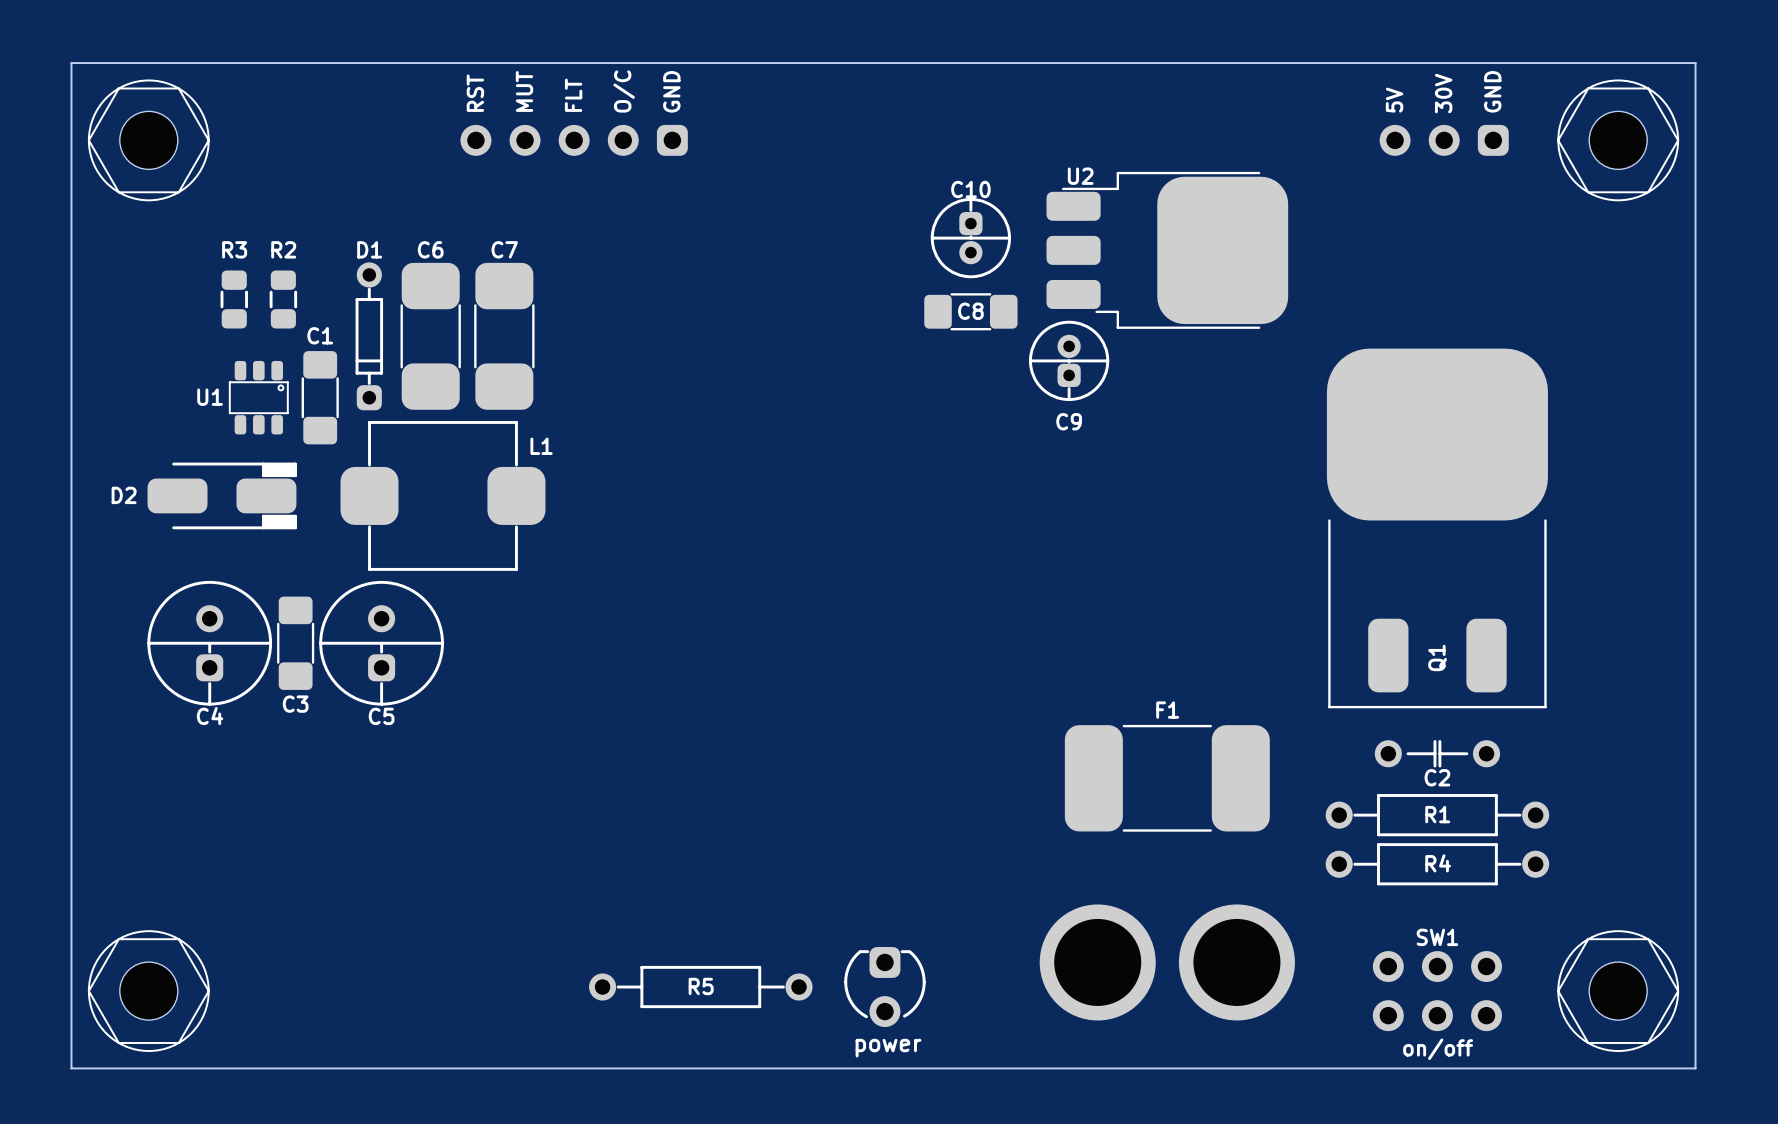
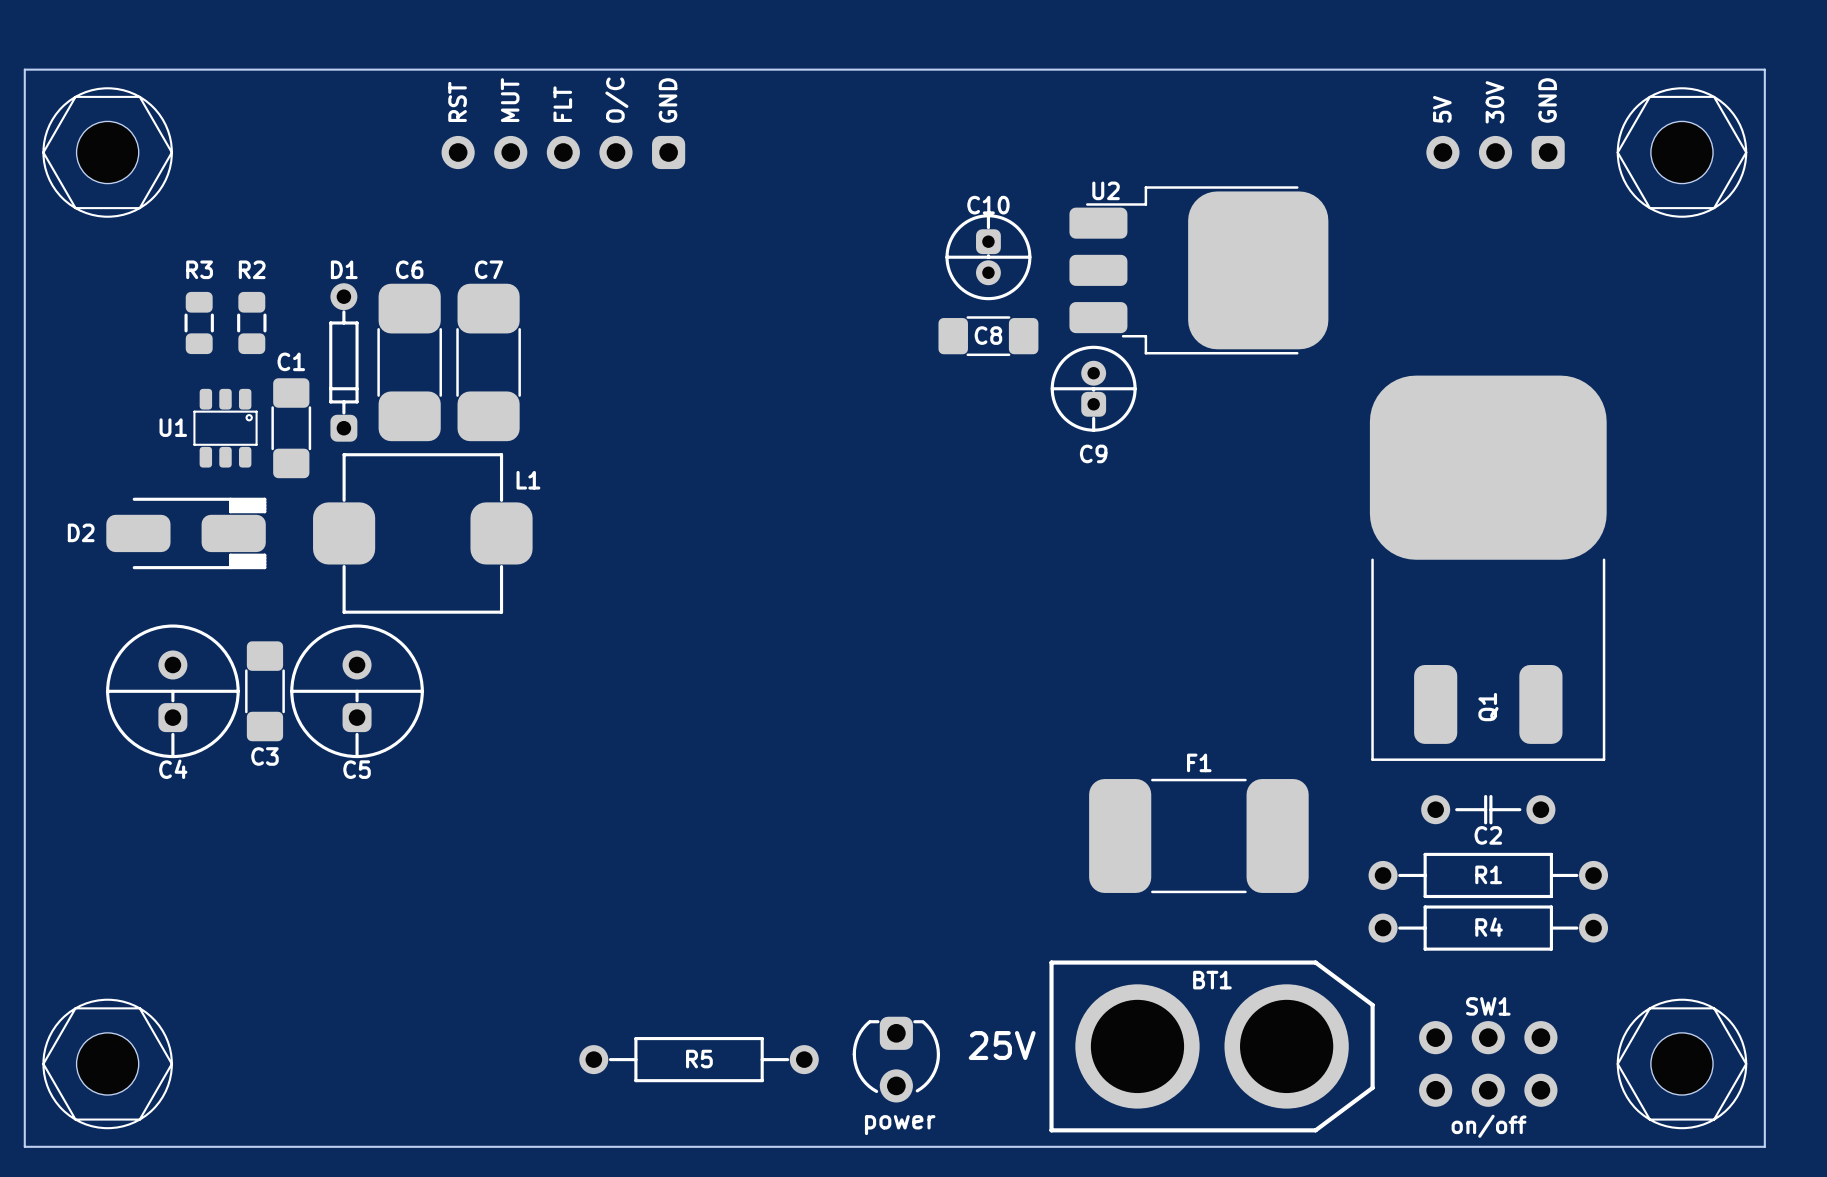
BT1 side: bottom (1167, 962) -> top (1212, 1046)

